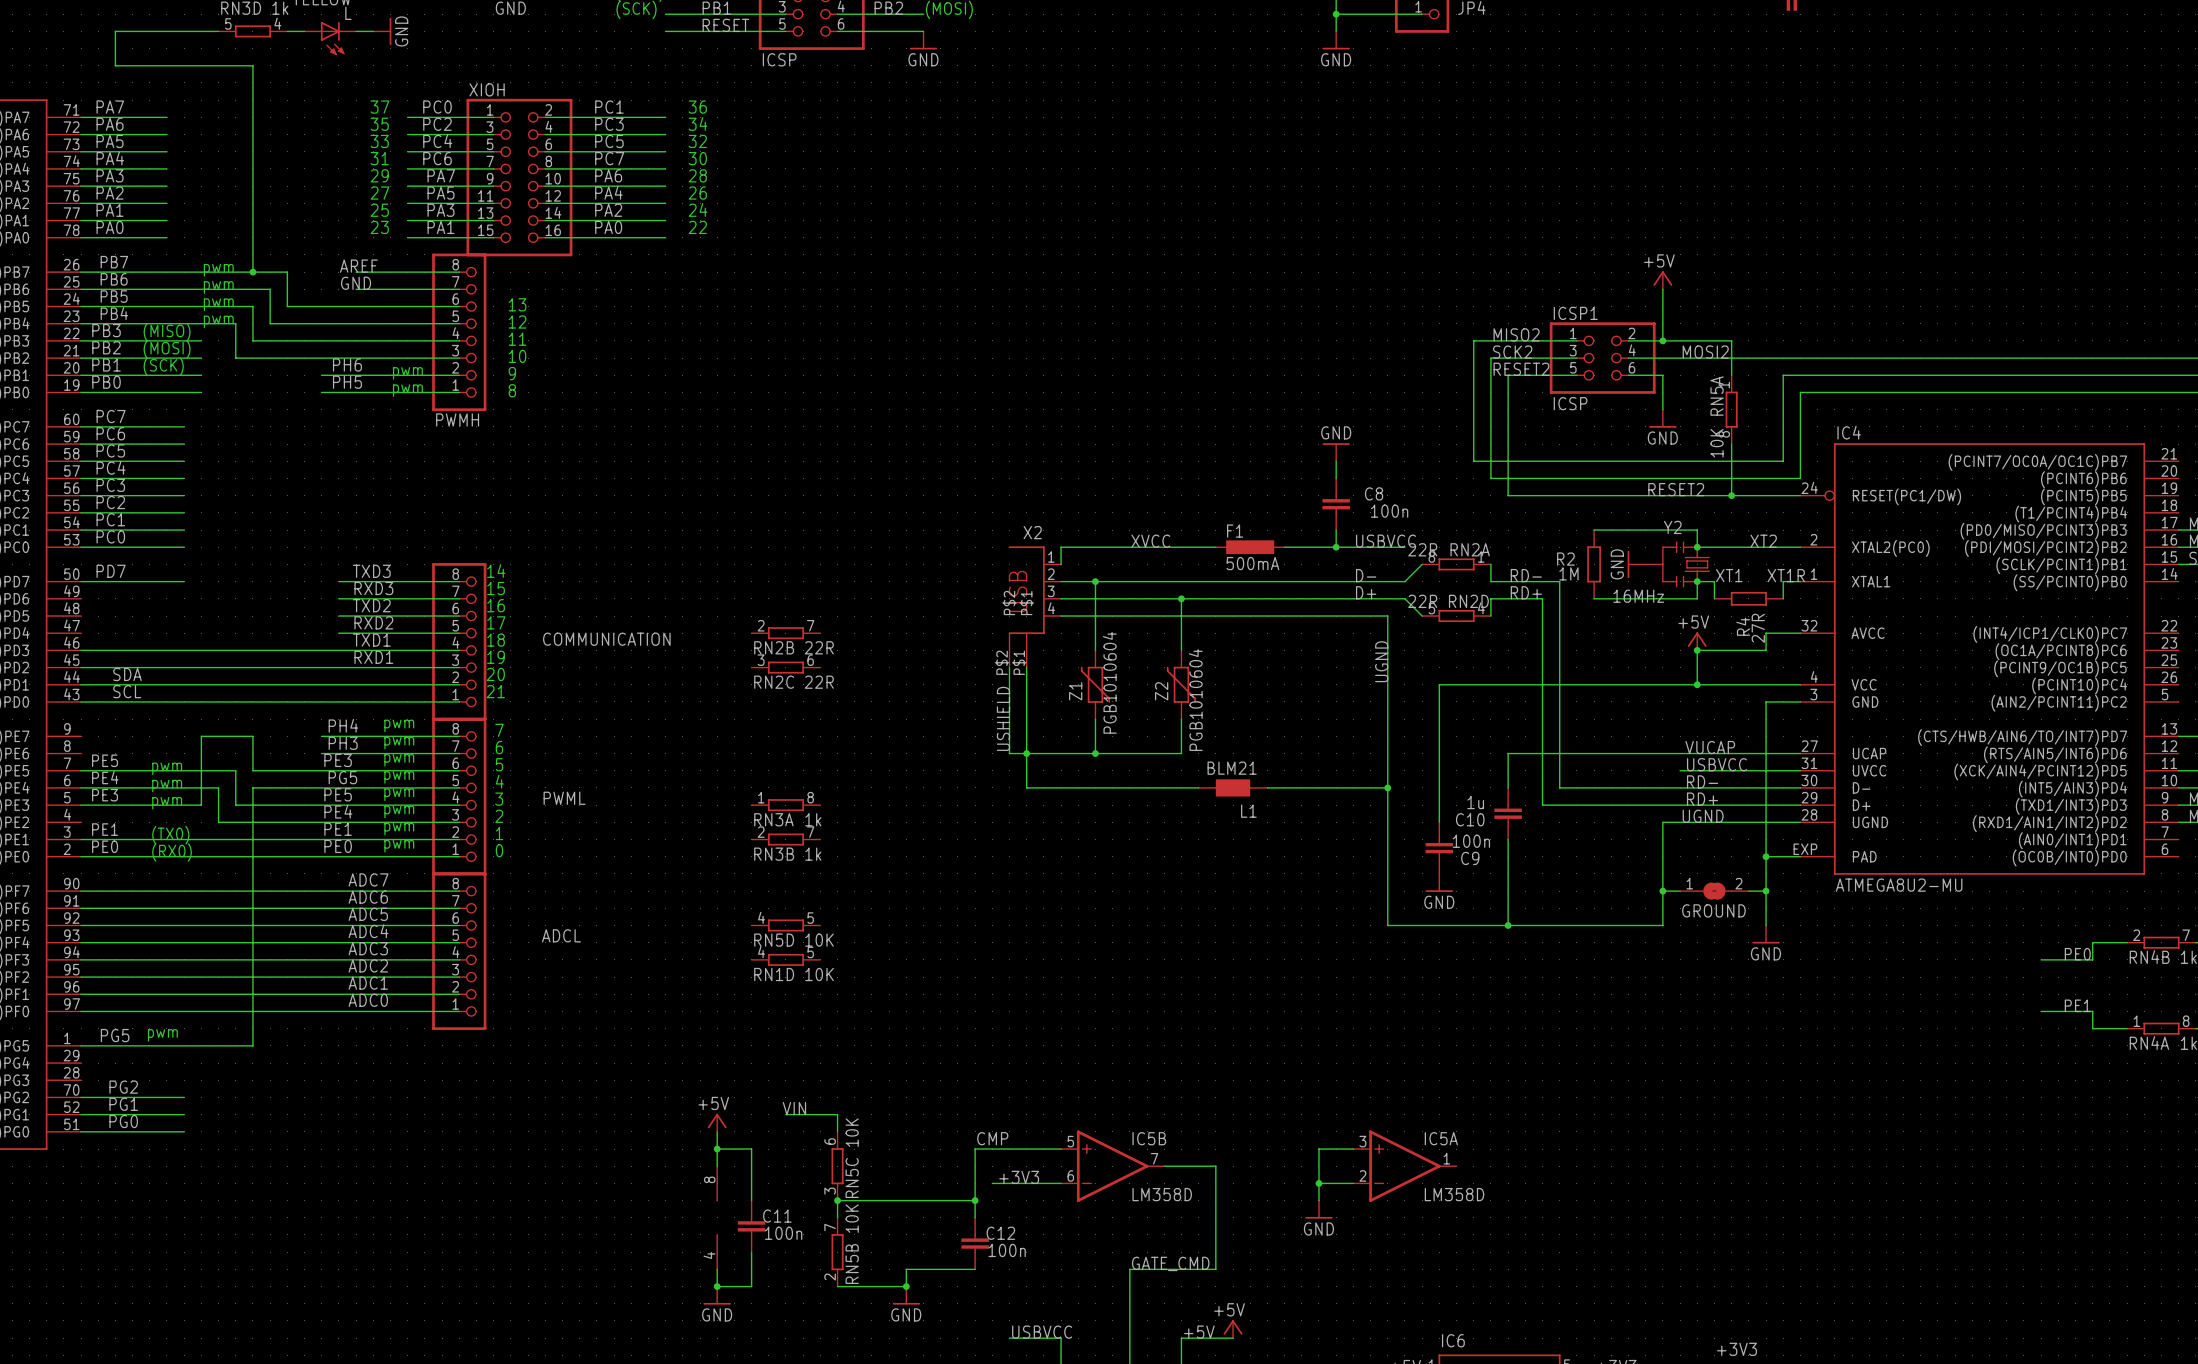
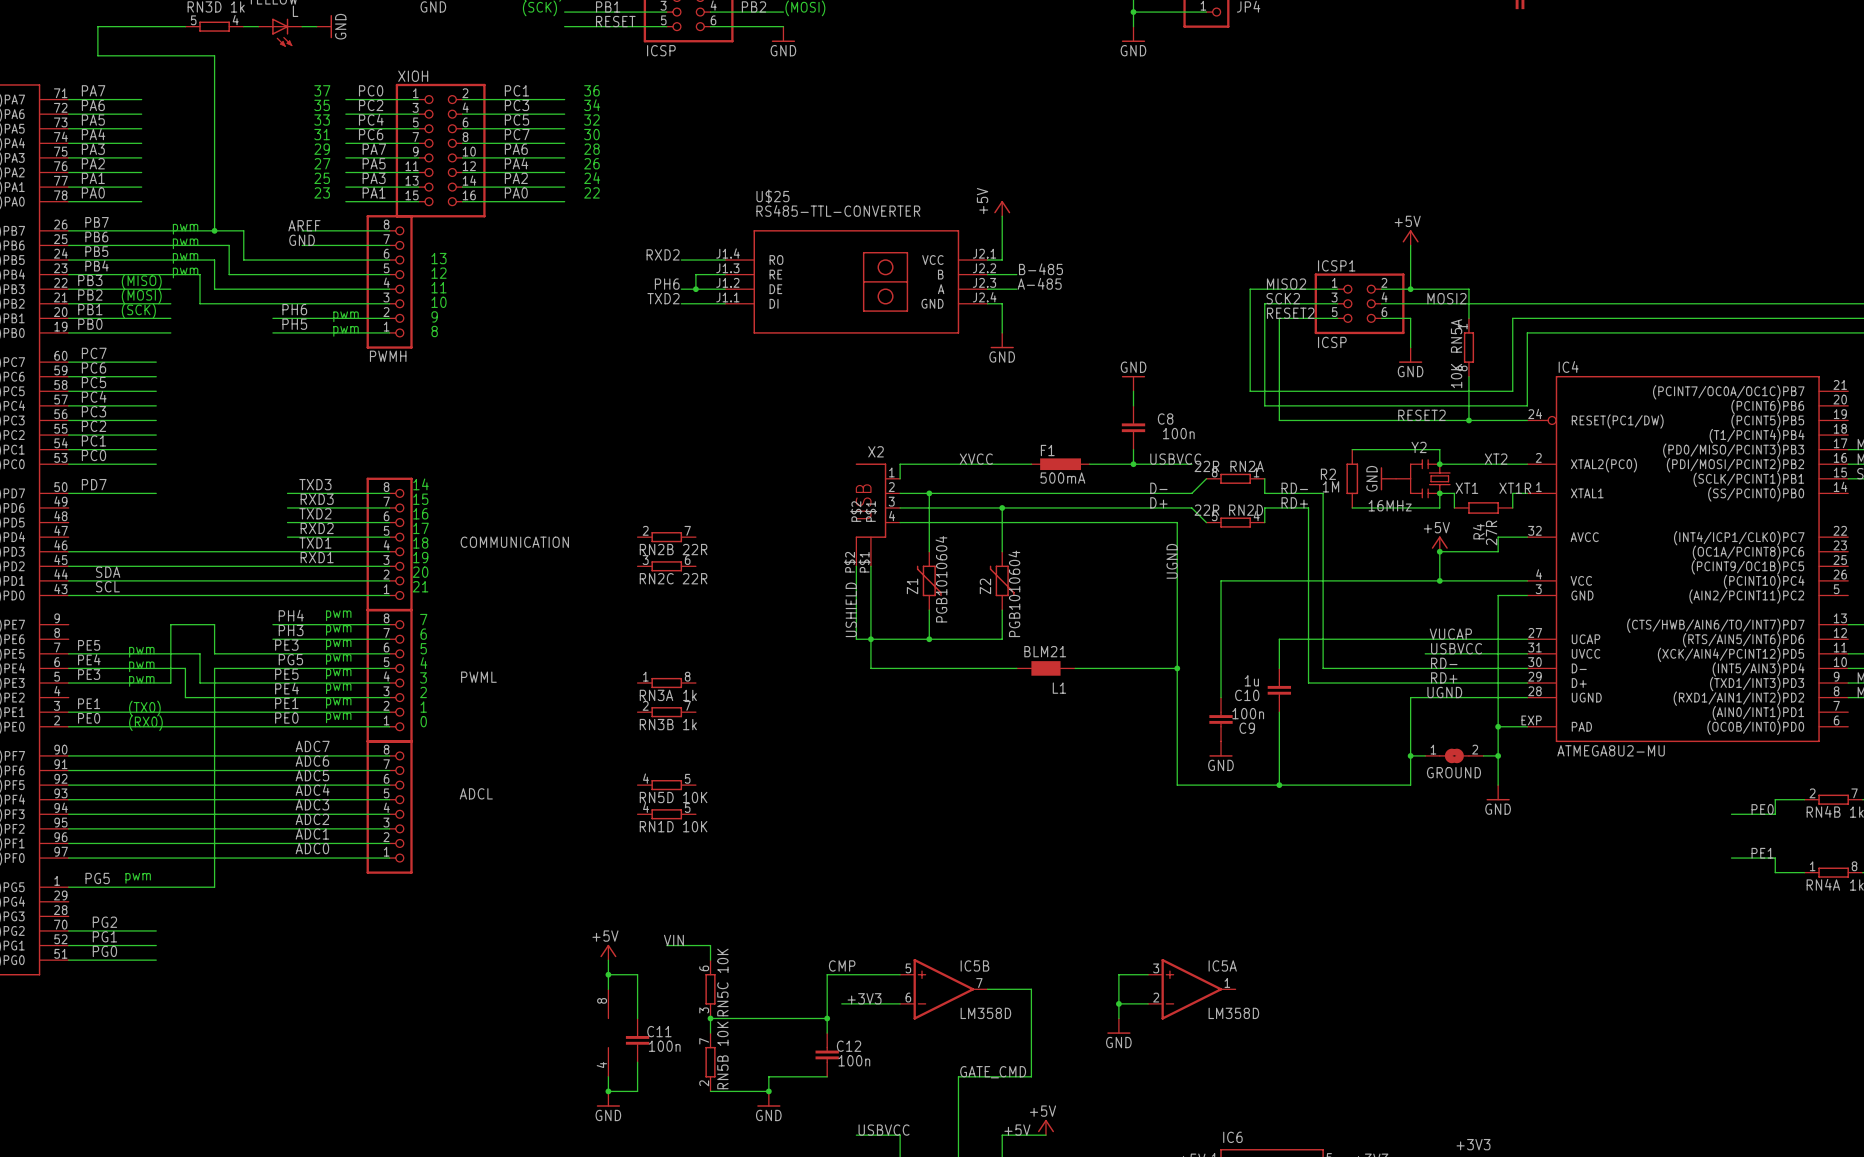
power symbol: none -> +5V (1002, 208)
wire: none -> (1002, 216) (1002, 260) (987, 260)
label: none -> RXD2 (663, 254)
wire: none -> (681, 260) (725, 260)
label: none -> B-485 (1040, 269)
wire: none -> (725, 274) (695, 274) (695, 289)
wire: none -> (987, 274) (1016, 274)
U$25: none -> RS485-TTL-CONVERTER (856, 281)
label: none -> PH6 (667, 284)
label: none -> A-485 (1039, 283)
wire: none -> (681, 289) (725, 289)
junction: none -> (695, 289)
wire: none -> (987, 289) (1016, 289)
label: none -> TXD2 (663, 298)
wire: none -> (681, 303) (725, 303)
wire: none -> (987, 303) (1002, 303) (1002, 332)
power symbol: none -> GND (1002, 340)

